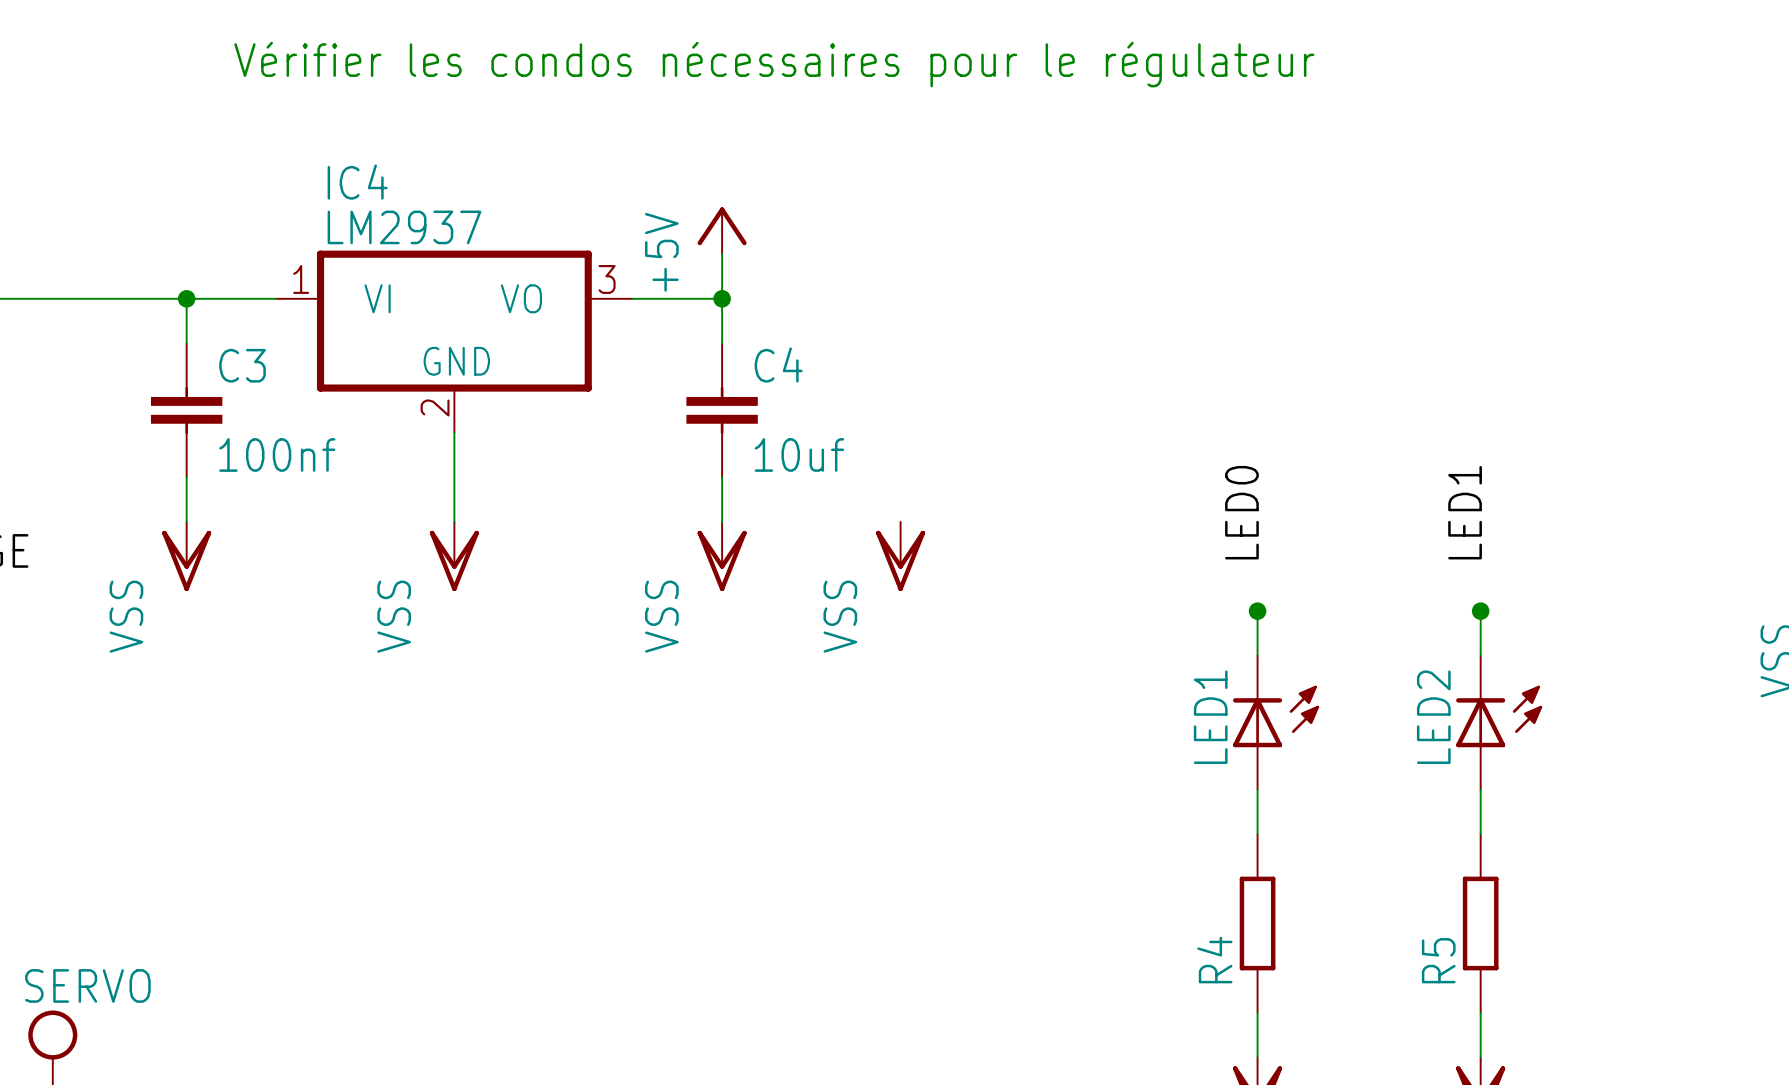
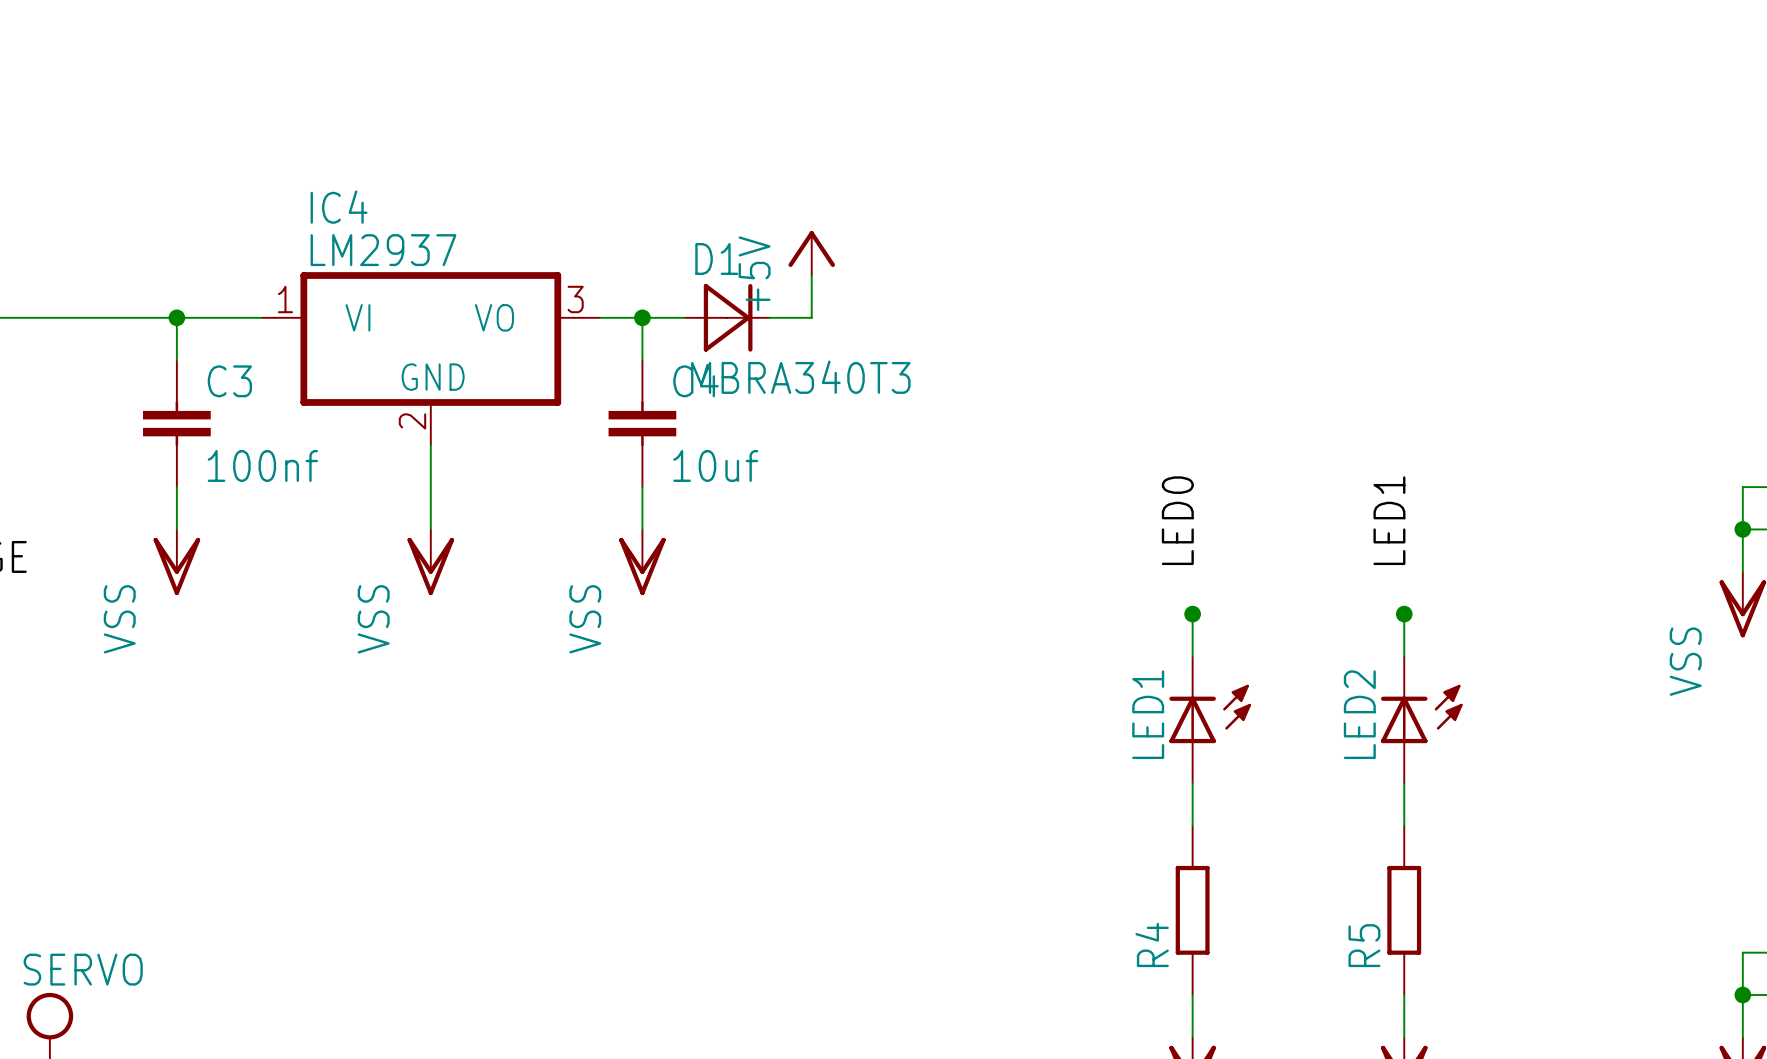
text: Vérifier les condos nécessaires pour le régulateur (774, 64) -> none
power symbol position: +5V (722, 230) -> +5V (811, 253)
wire: (722, 254) (722, 343) -> none
wire: none -> (811, 275) (811, 317) (769, 317)
wire: none -> (642, 317) (642, 360)
junction position: (722, 298) -> (642, 317)
D1: none -> MBRA340T3 (727, 317)
C4 position: (722, 410) -> (642, 423)
wire: (722, 477) (722, 521) -> (642, 487) (642, 529)
power symbol position: VSS (722, 556) -> VSS (642, 562)
power symbol: VSS (900, 556) -> none

